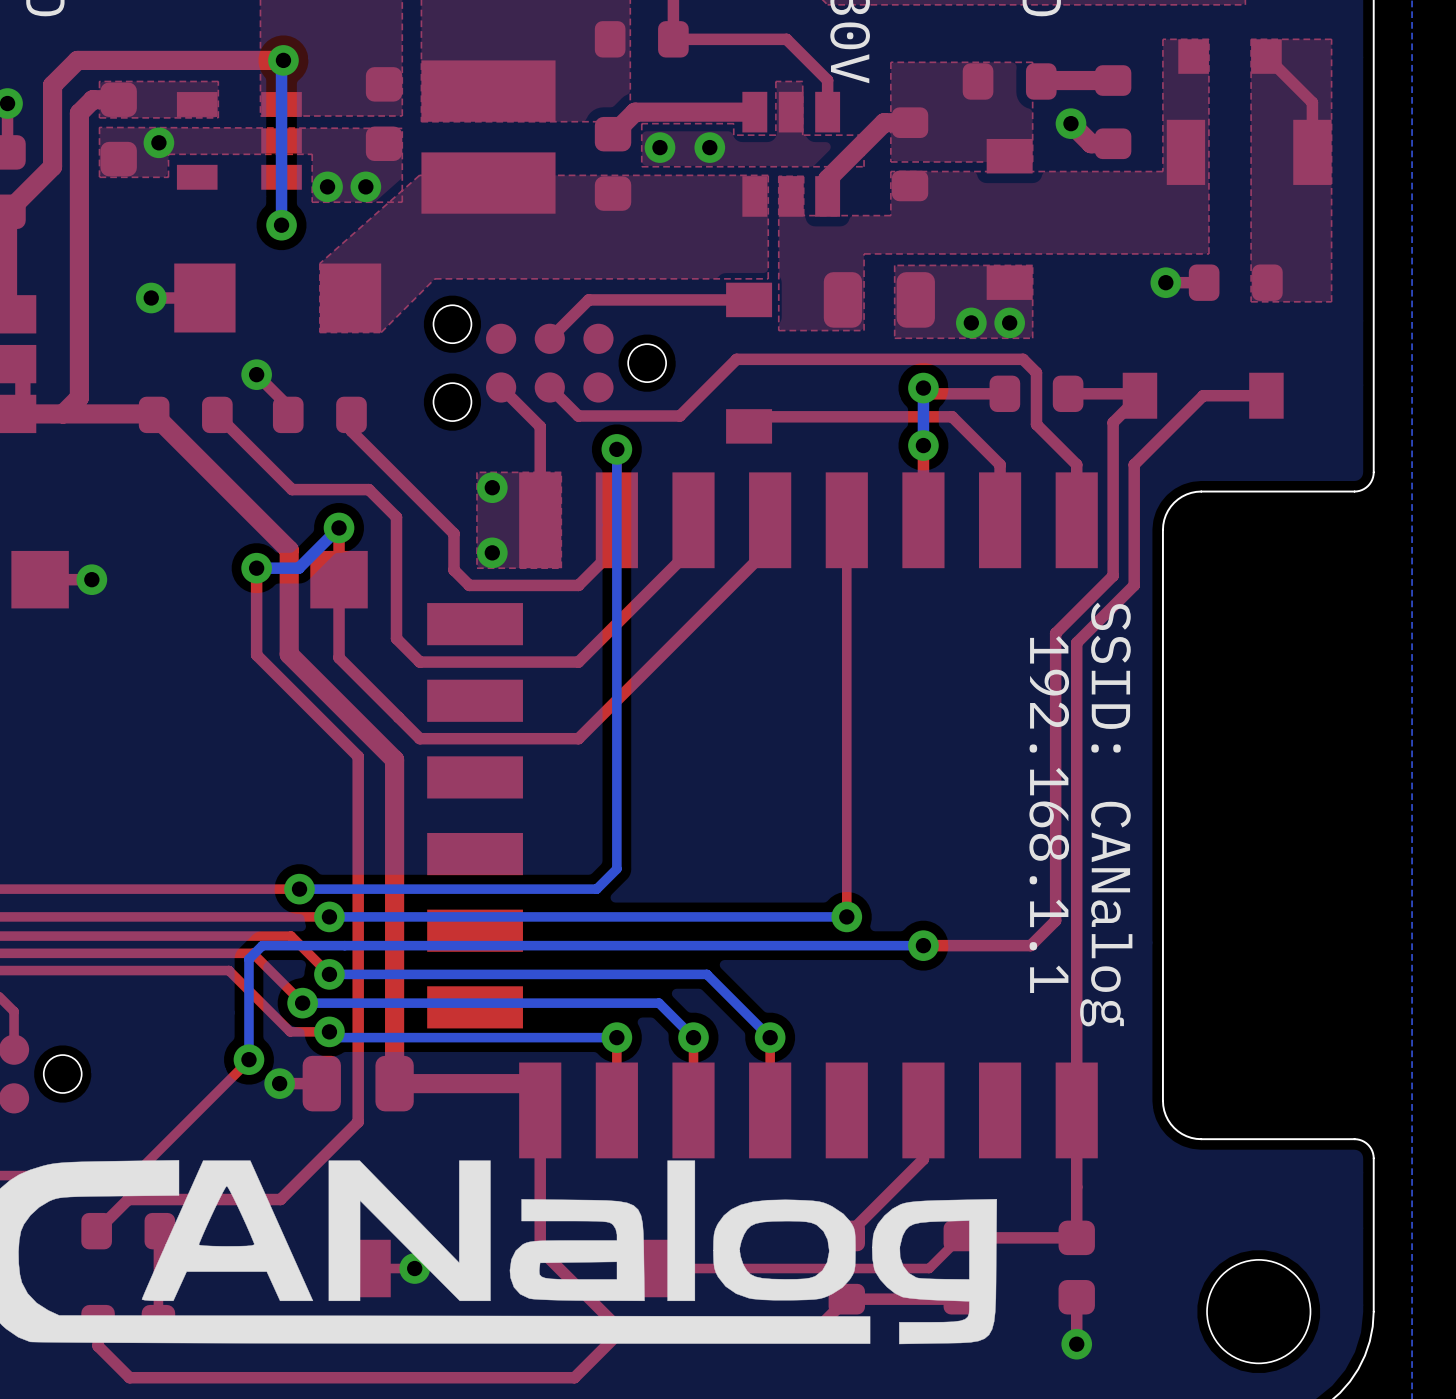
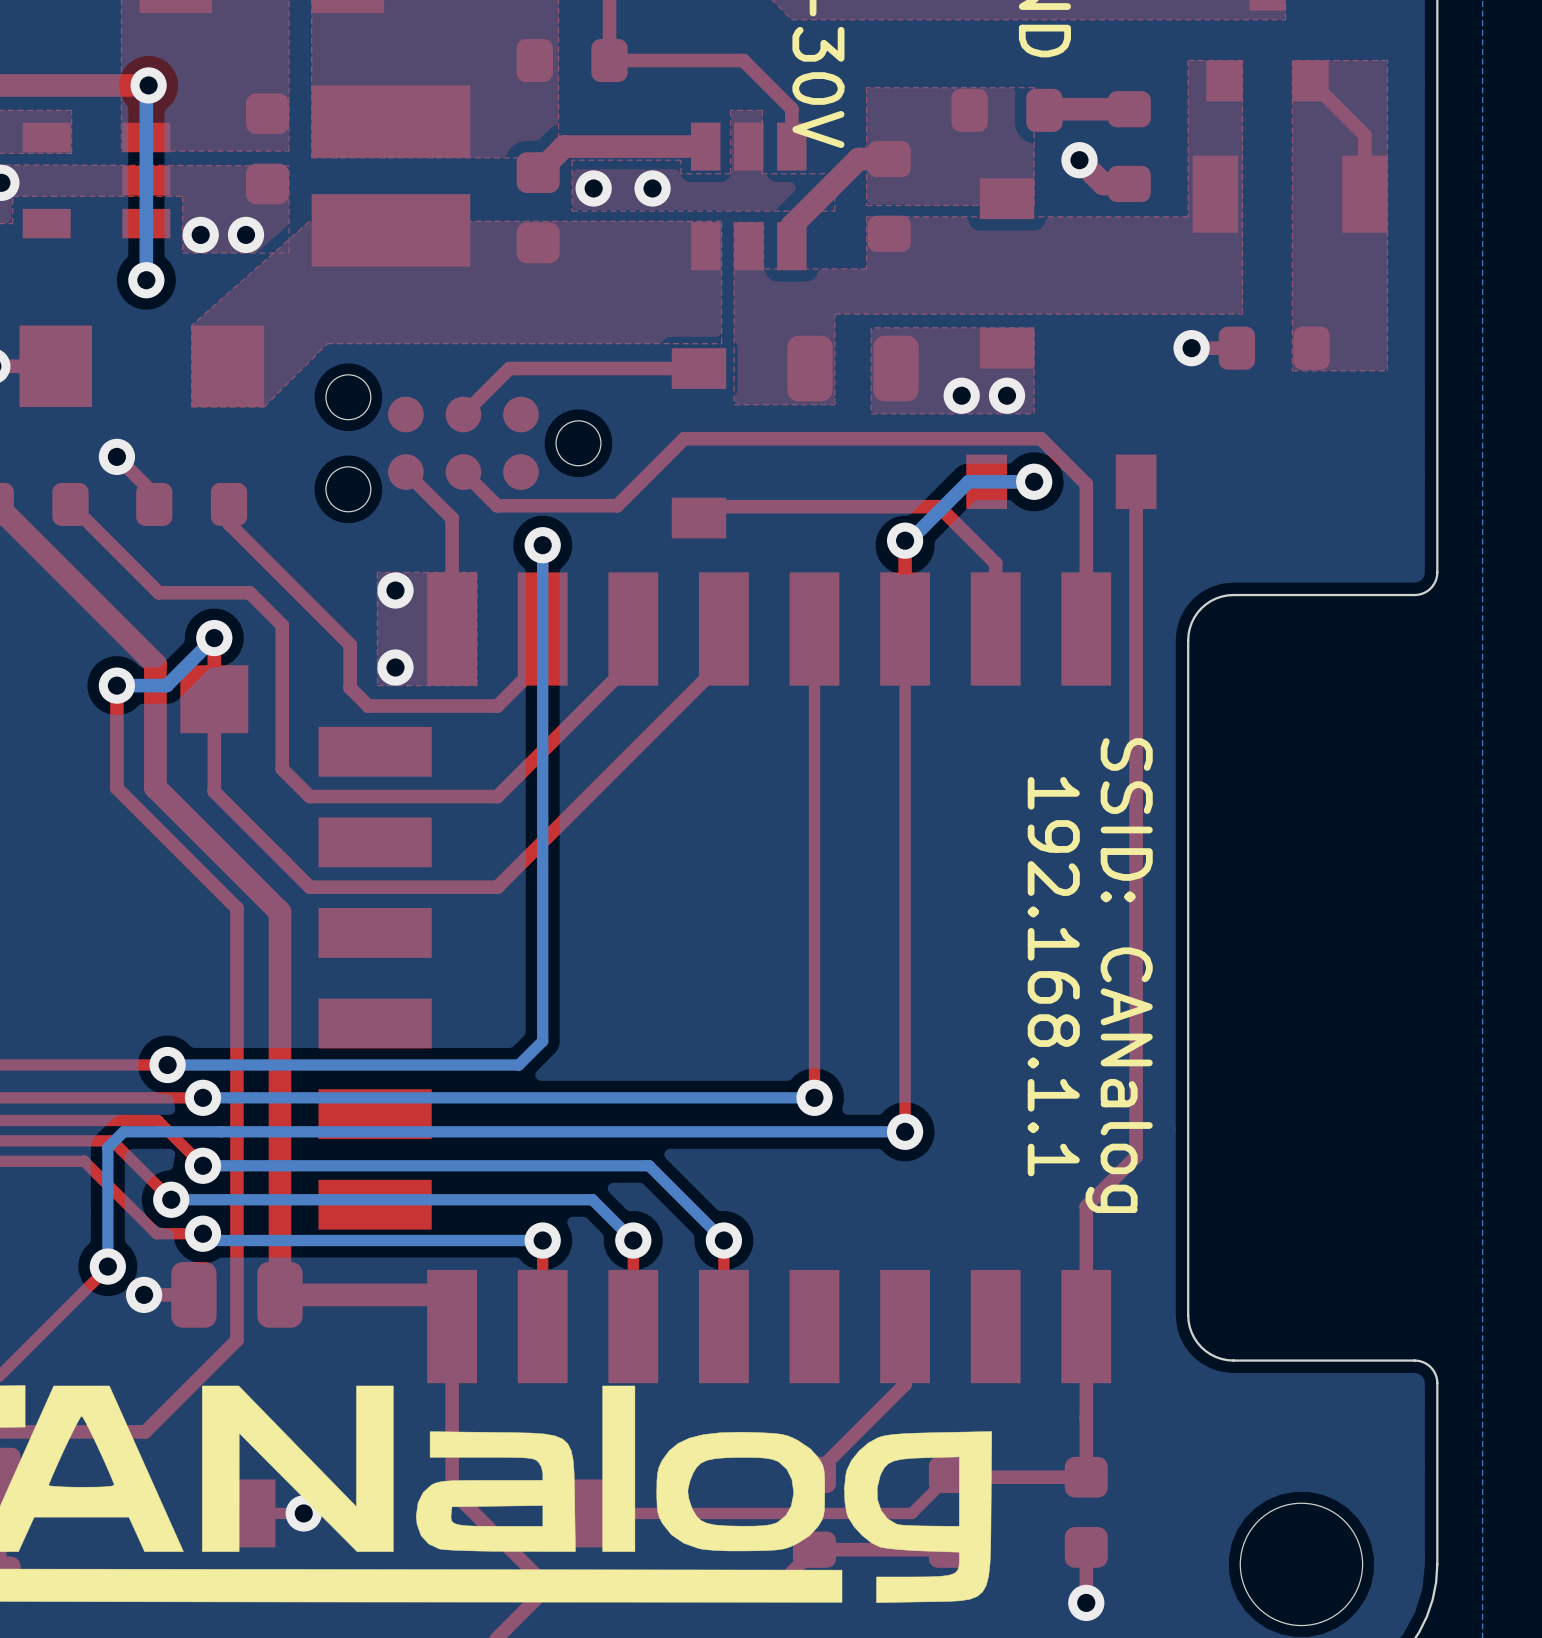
top track: (1023, 359) (1036, 372) (1036, 424) (1076, 464) -> (1022, 438) (1040, 438) (1086, 484) (1086, 563)
part footprint: [989, 375, 1084, 413] -> [966, 454, 1157, 509]
top track: (923, 388) (929, 393) (1004, 393) -> none
bottom track: (923, 388) (923, 445) -> none
via position: (923, 388) -> (1034, 481)
top track: (1068, 393) (1138, 393) (1139, 395) (1113, 422) (1113, 575) (1055, 633) (1055, 920) (1030, 945) (923, 945) -> (905, 660) (905, 1131)
bottom track: none -> (1034, 481) (968, 481) (905, 545)
part: (1203, 395) -> none
top track: (1266, 395) (1203, 395) (1134, 464) (1134, 585) (1076, 642) (1076, 1008) -> (1136, 481) (1136, 1156) (1086, 1206)

